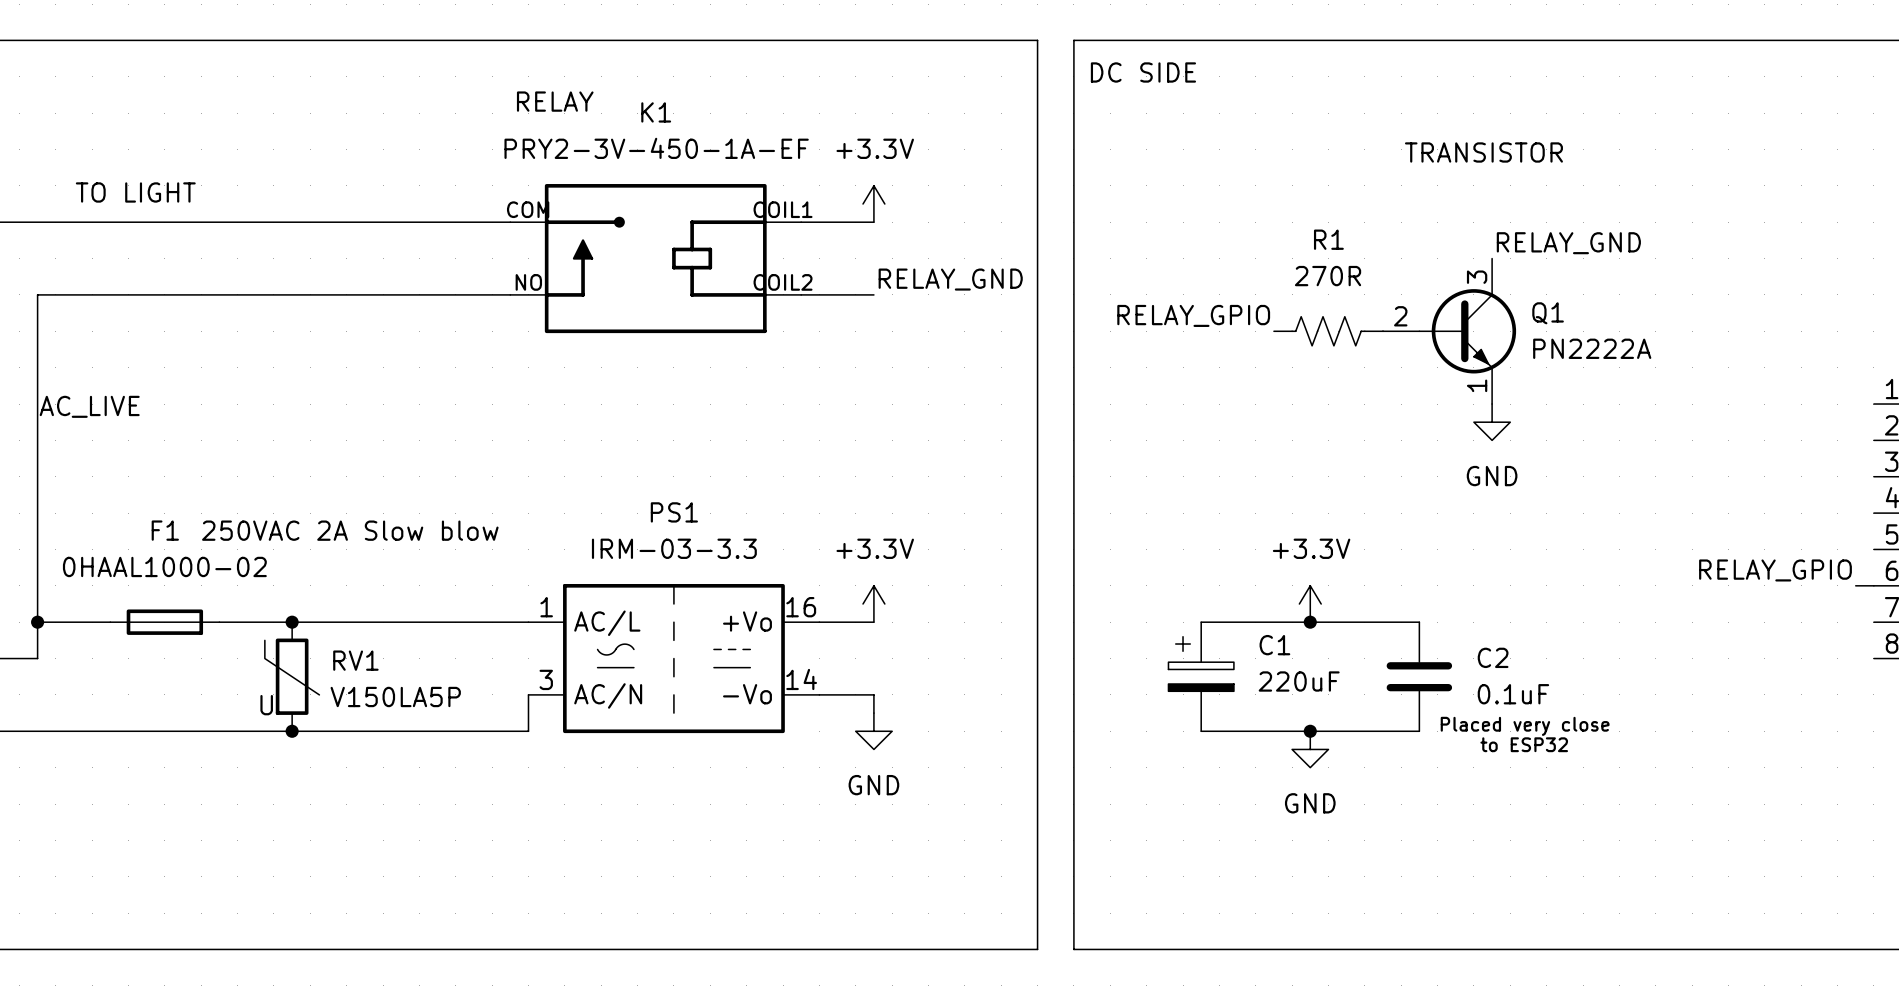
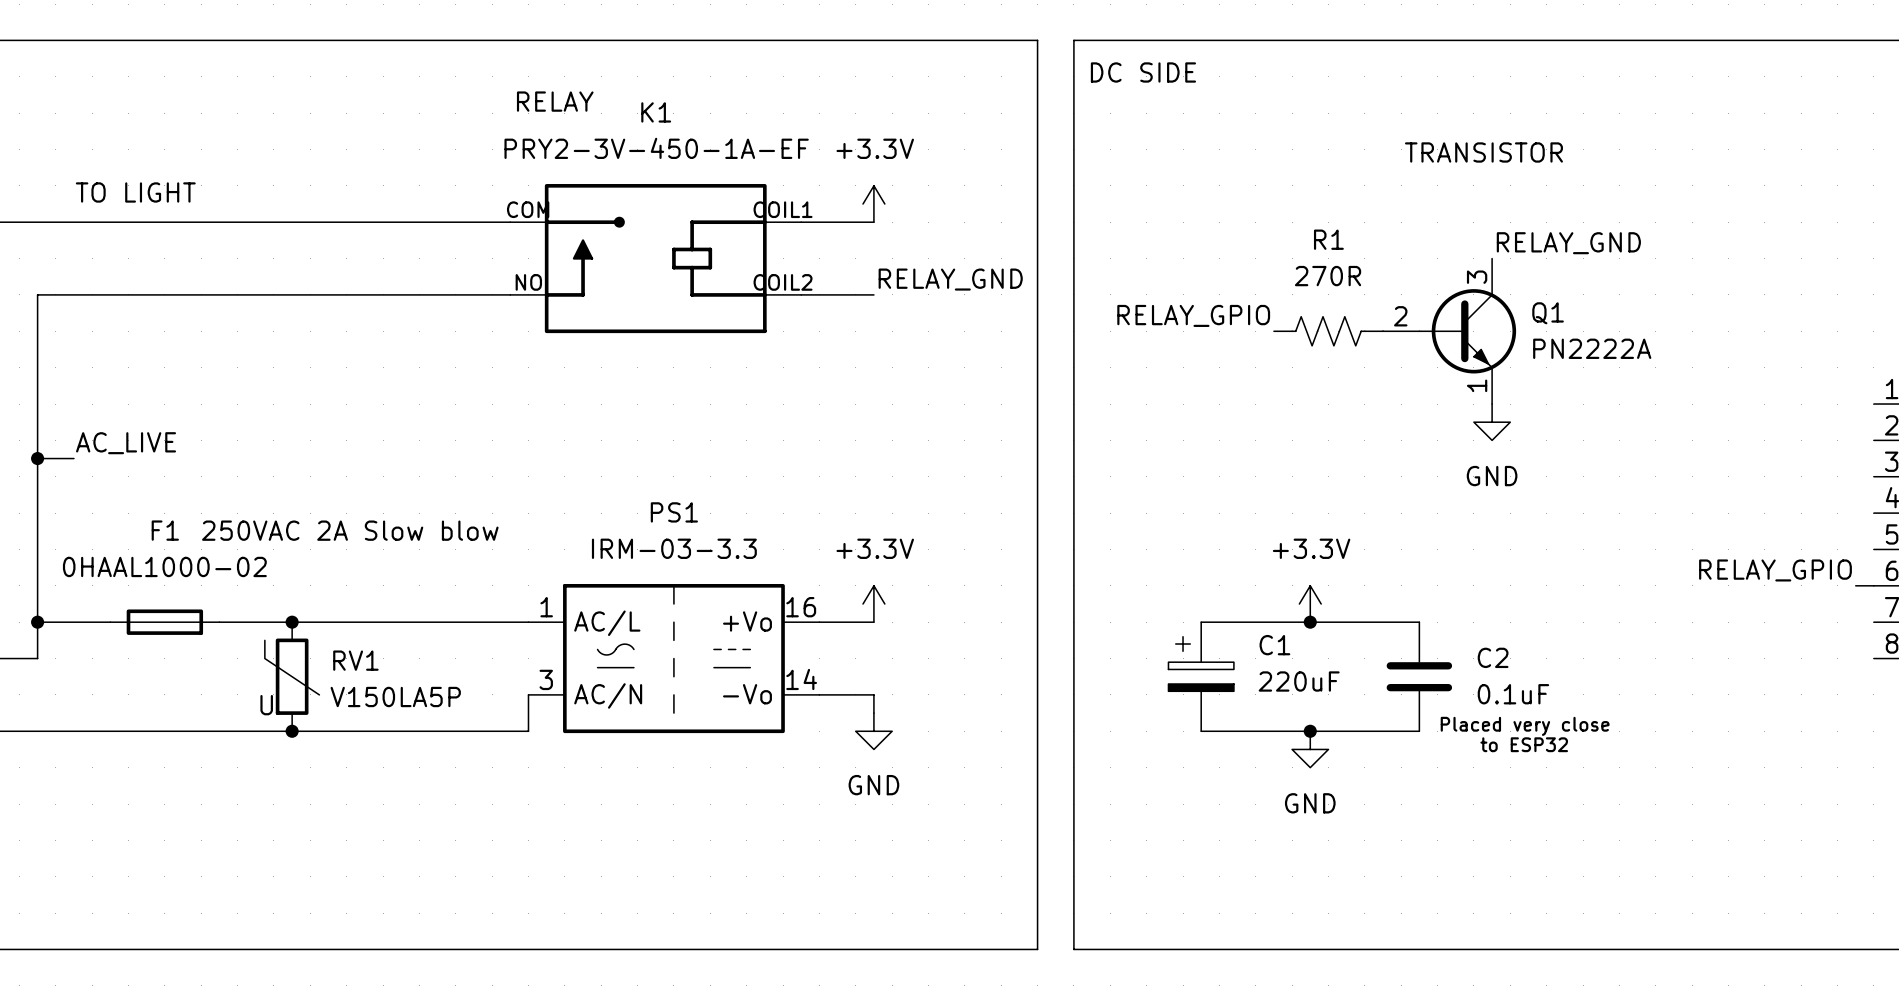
label position: AC_LIVE (89, 406) -> AC_LIVE (126, 443)
wire: none -> (37, 458) (73, 458)
junction: none -> (37, 458)

